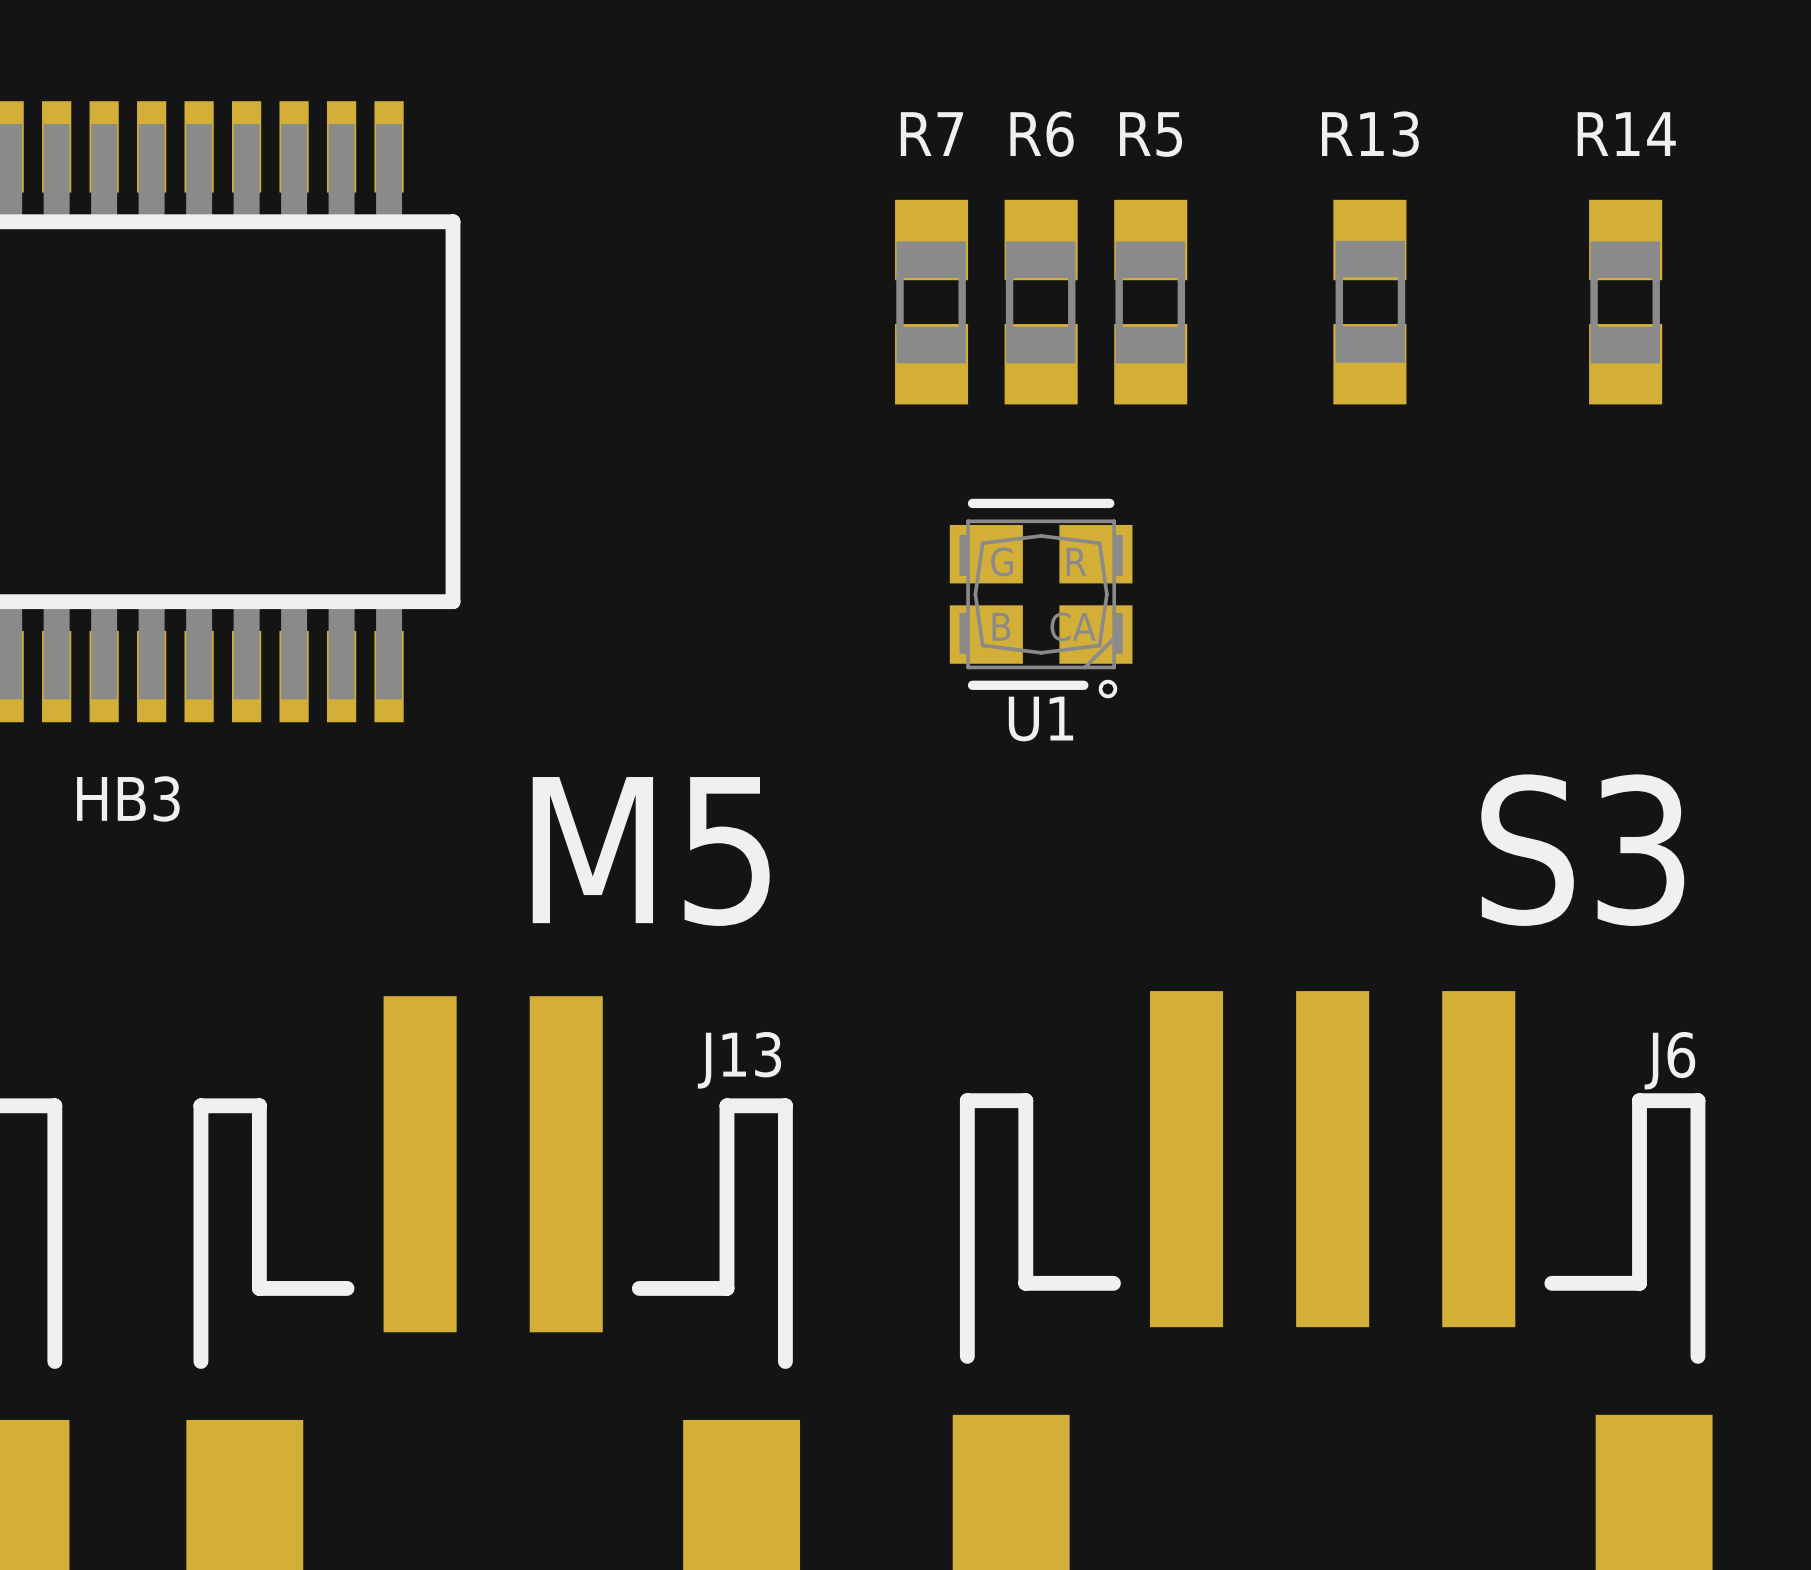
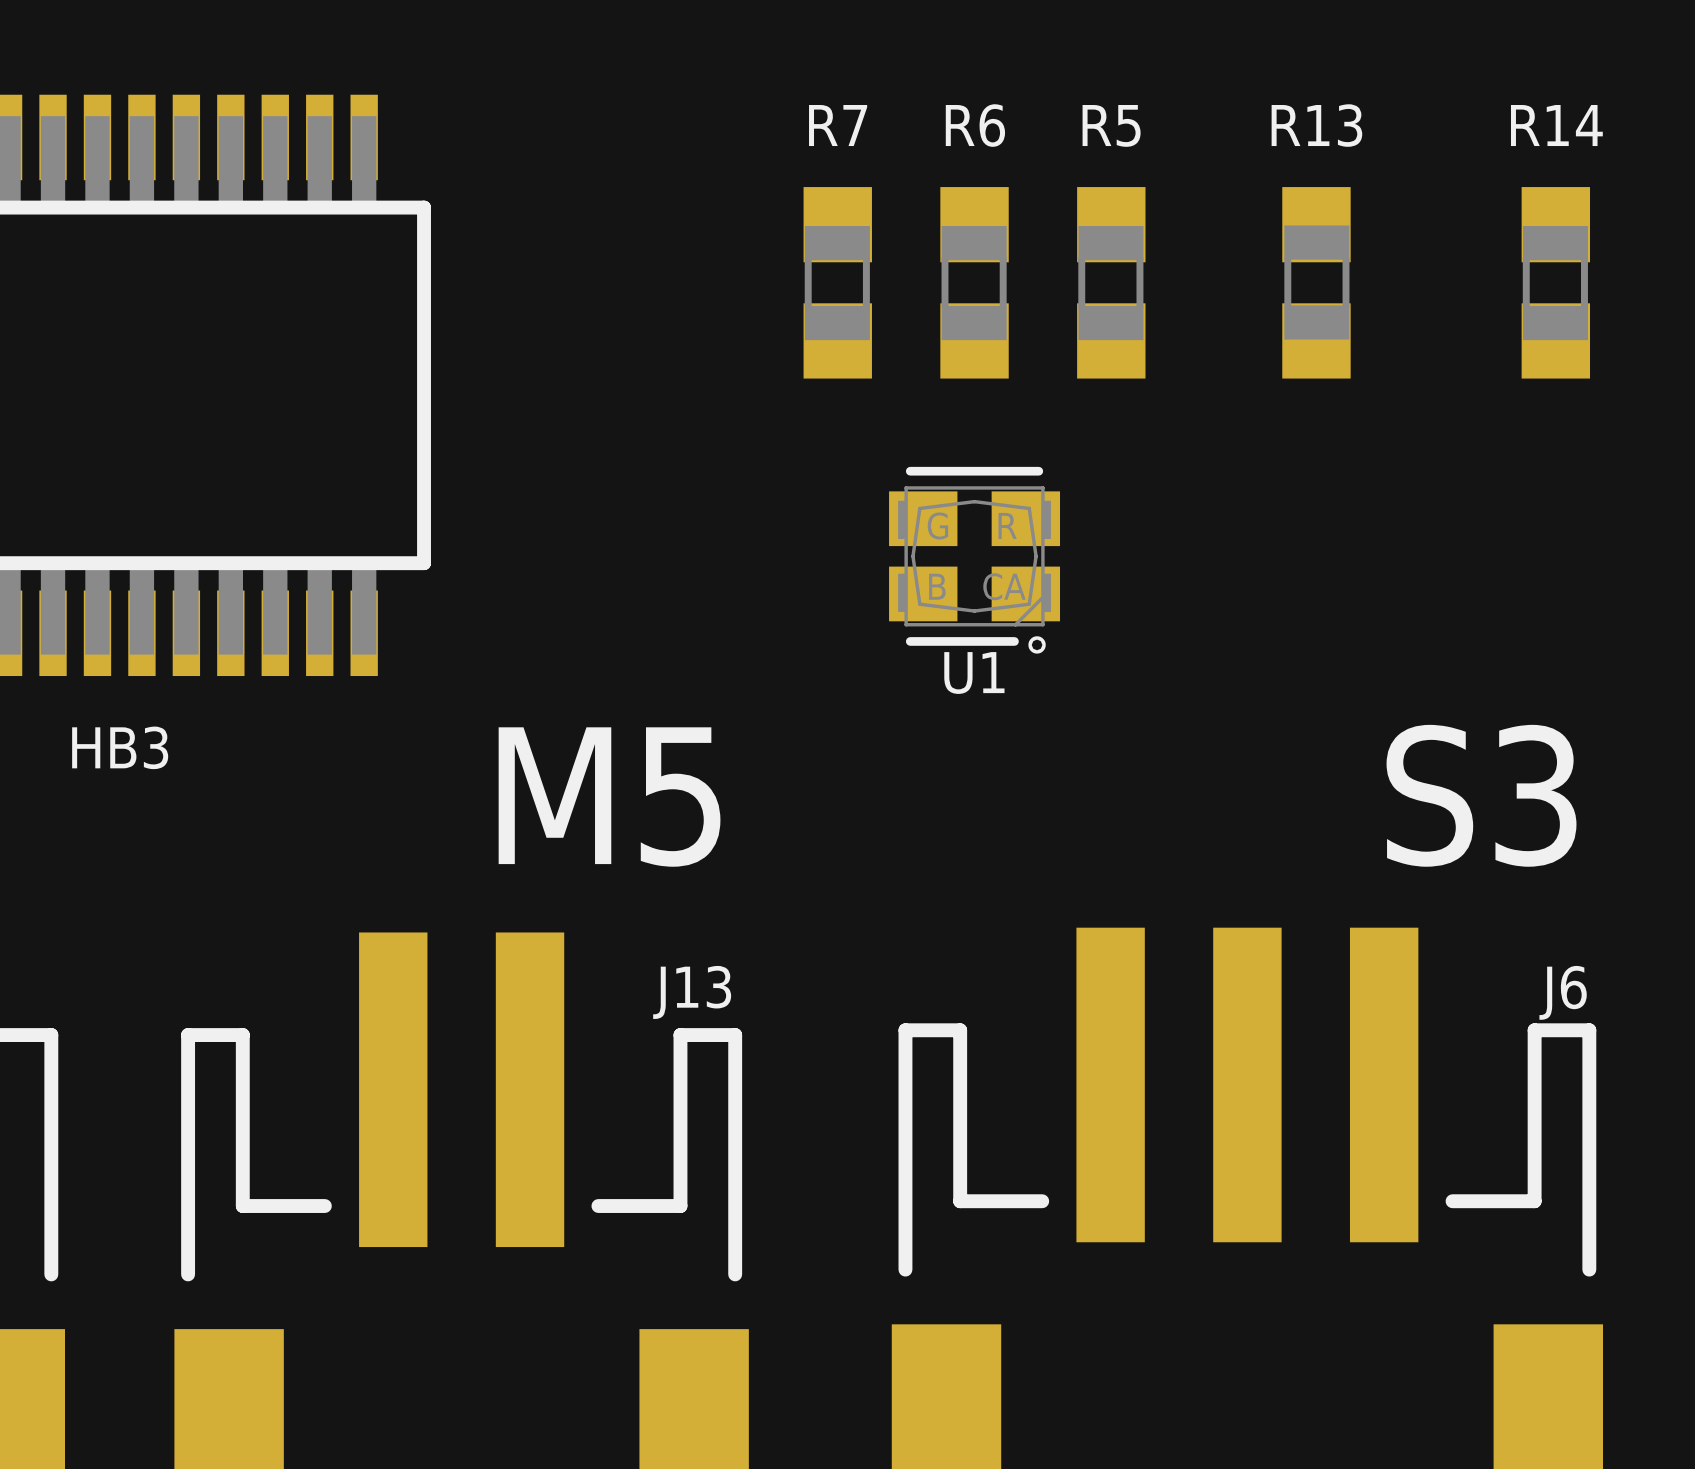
R7 position: (931, 302) -> (837, 282)
R5 position: (1150, 302) -> (1111, 282)
R13 position: (1369, 302) -> (1316, 282)
R14 position: (1625, 302) -> (1555, 282)

